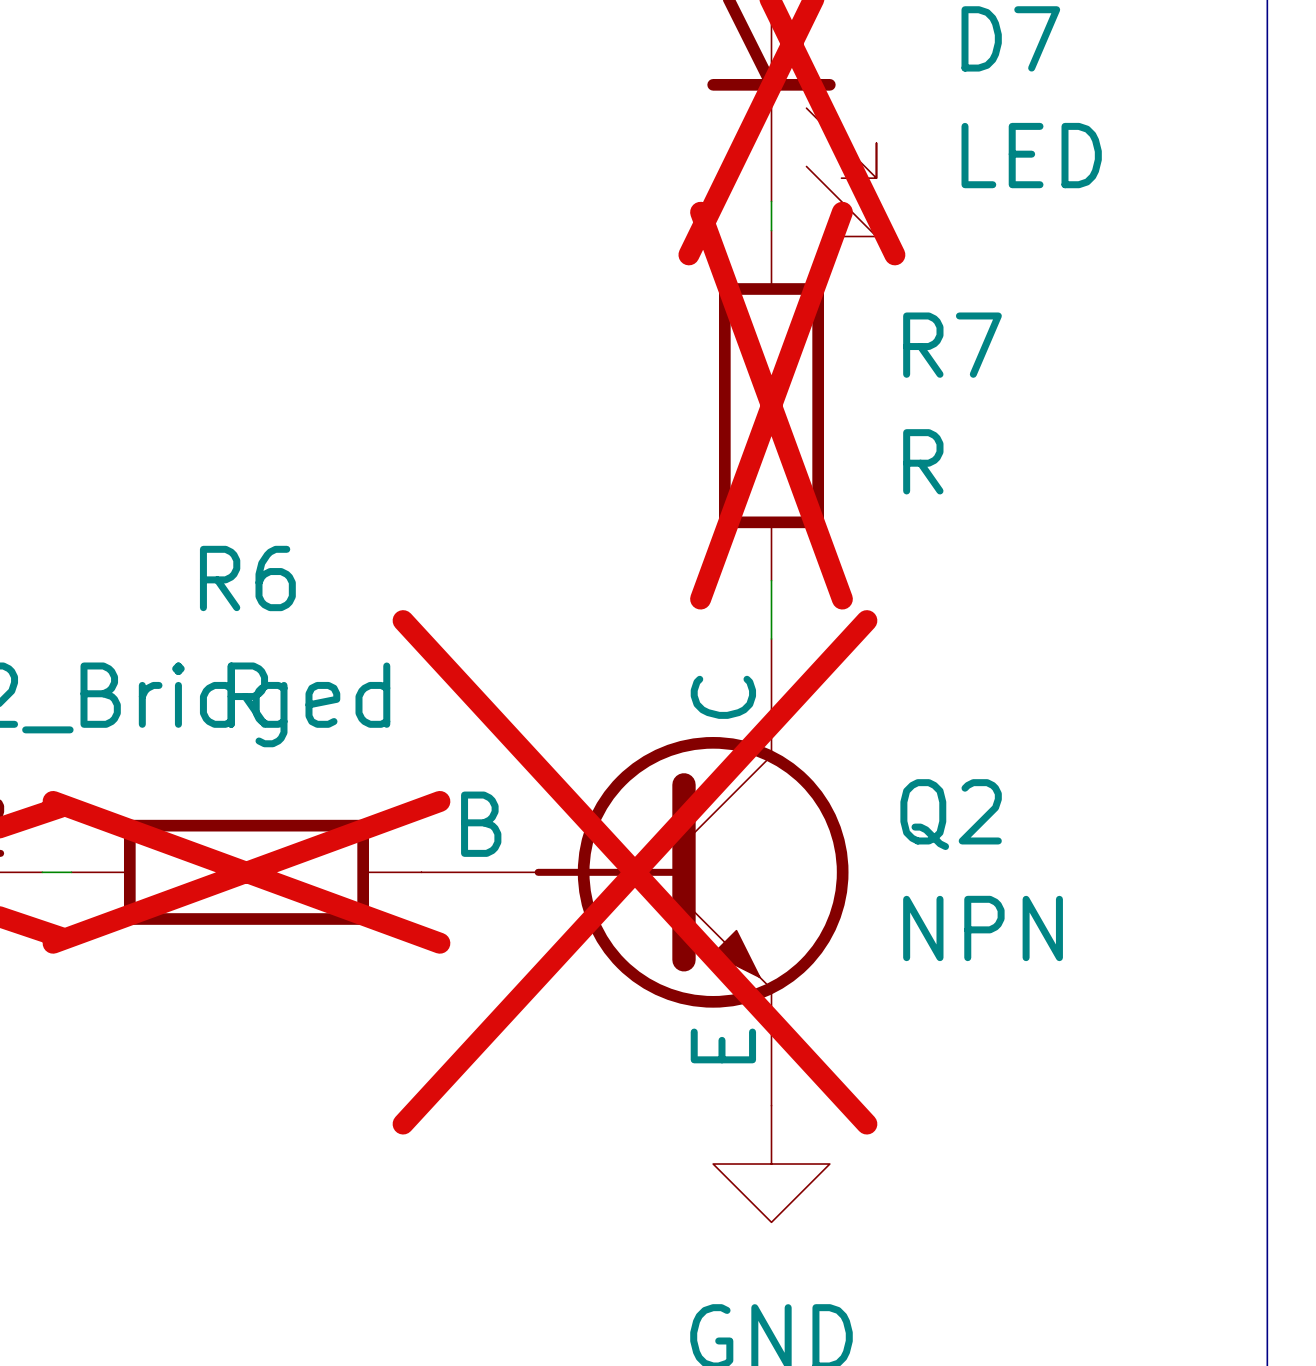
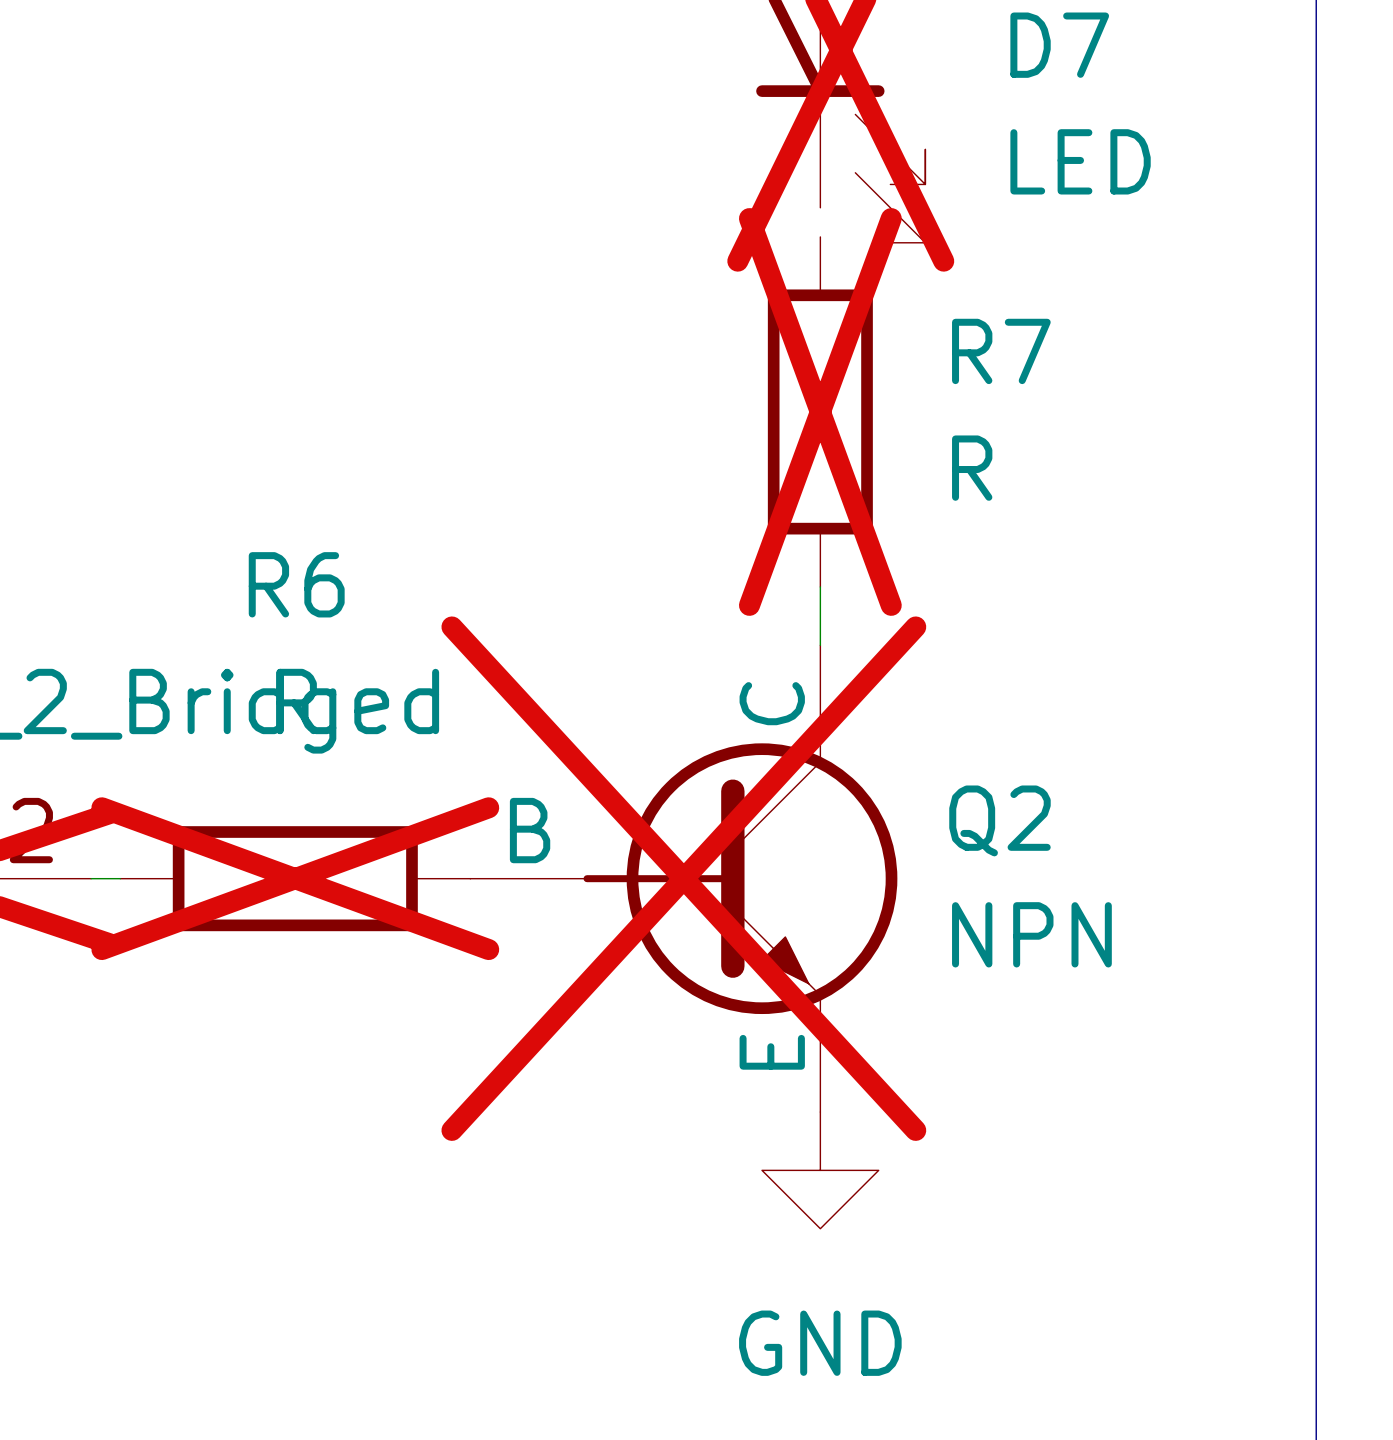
wire: (771, 201) (771, 230) -> none

